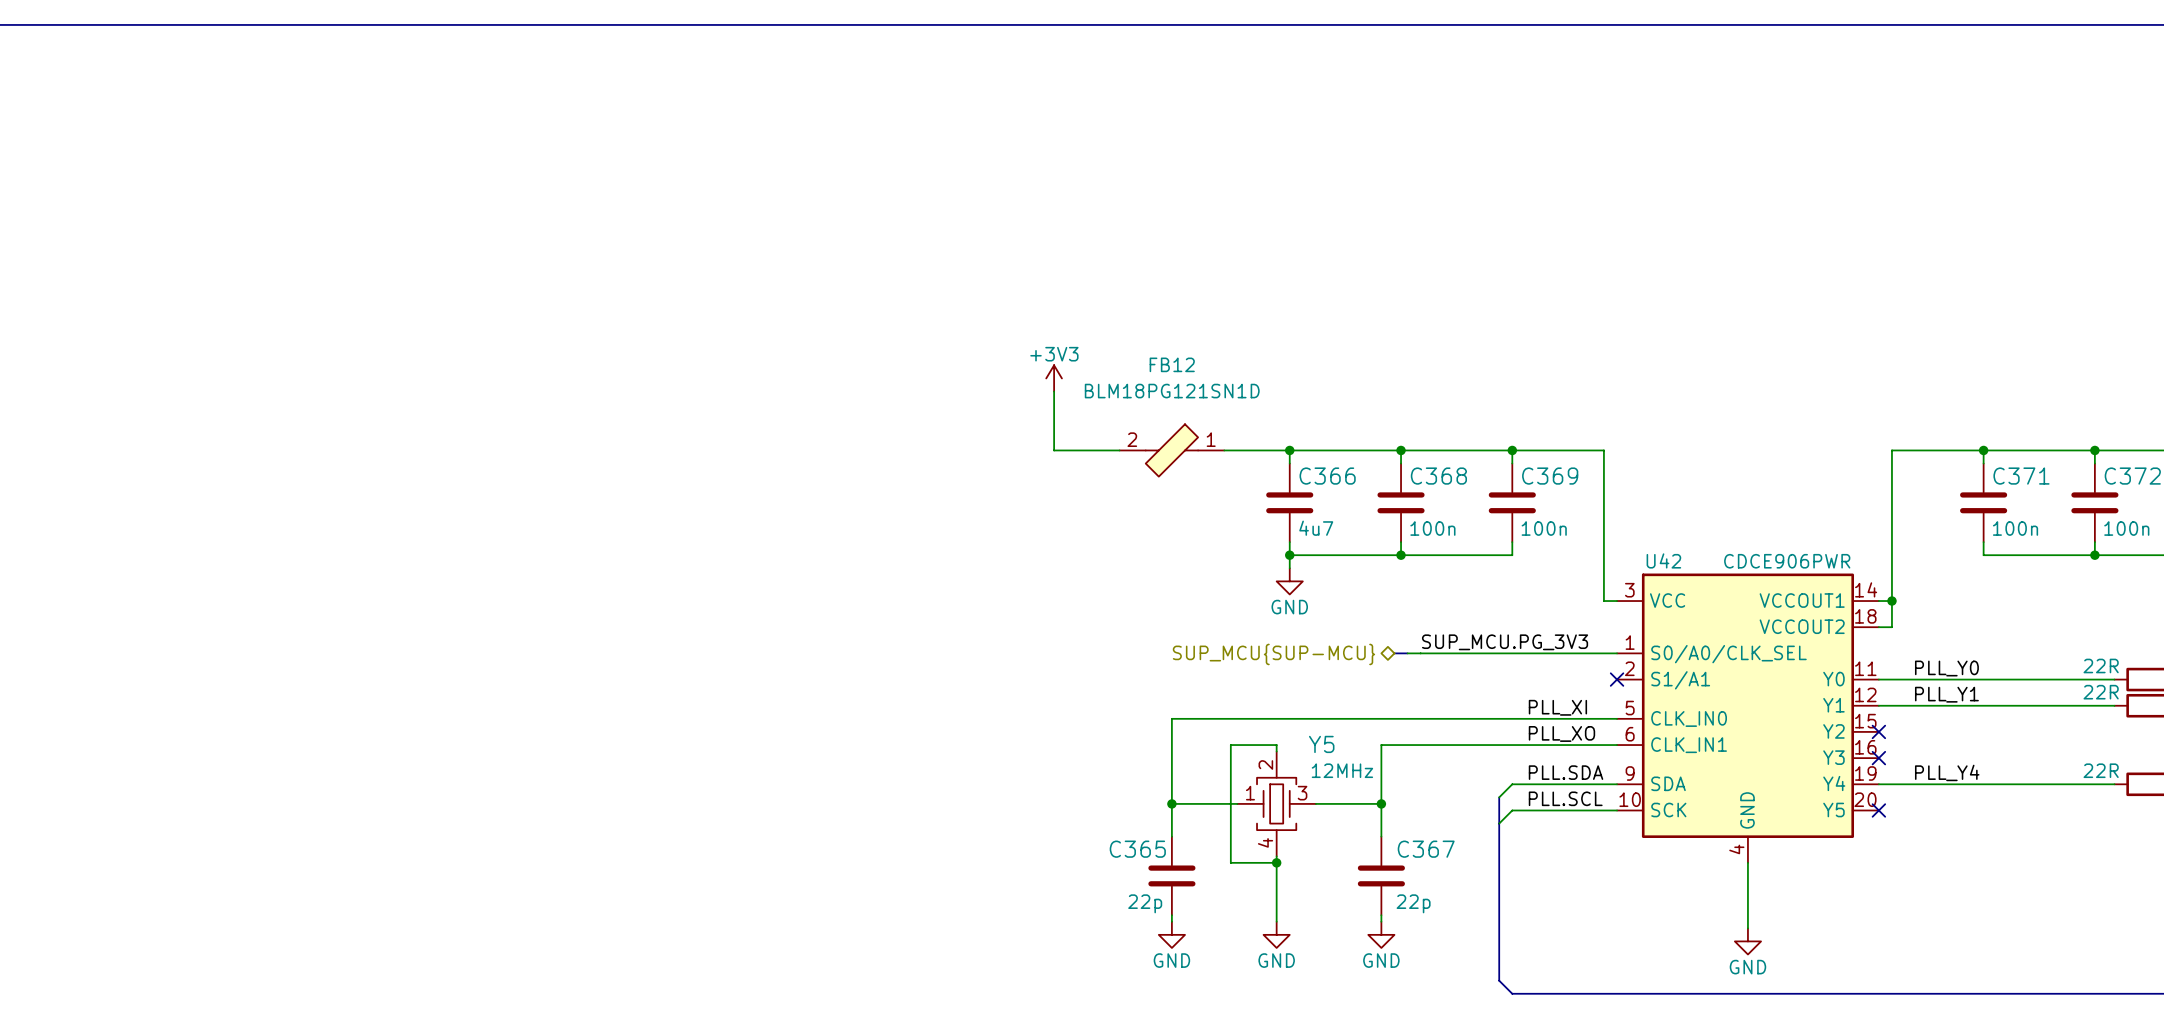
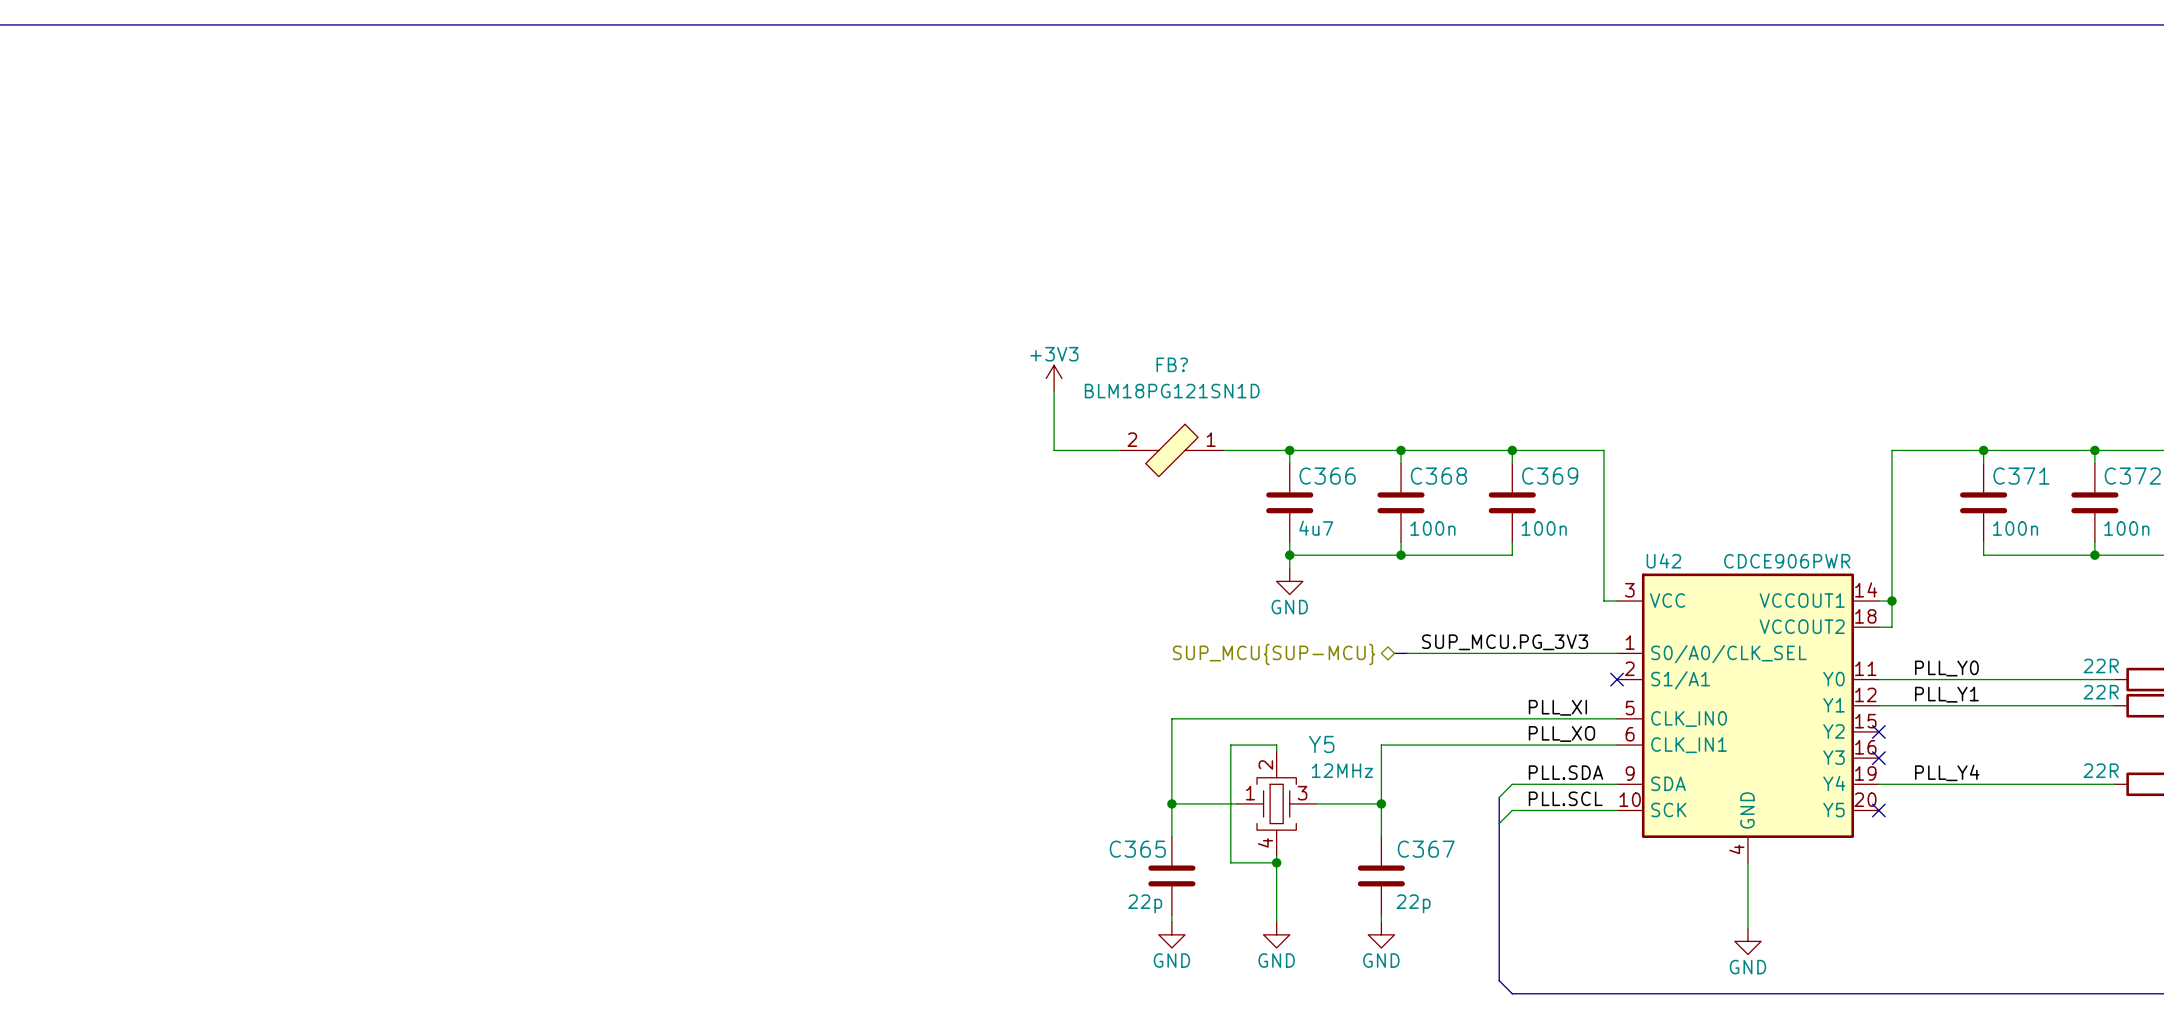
FB12 name: FB12 (1172, 364) -> FB? (1172, 364)

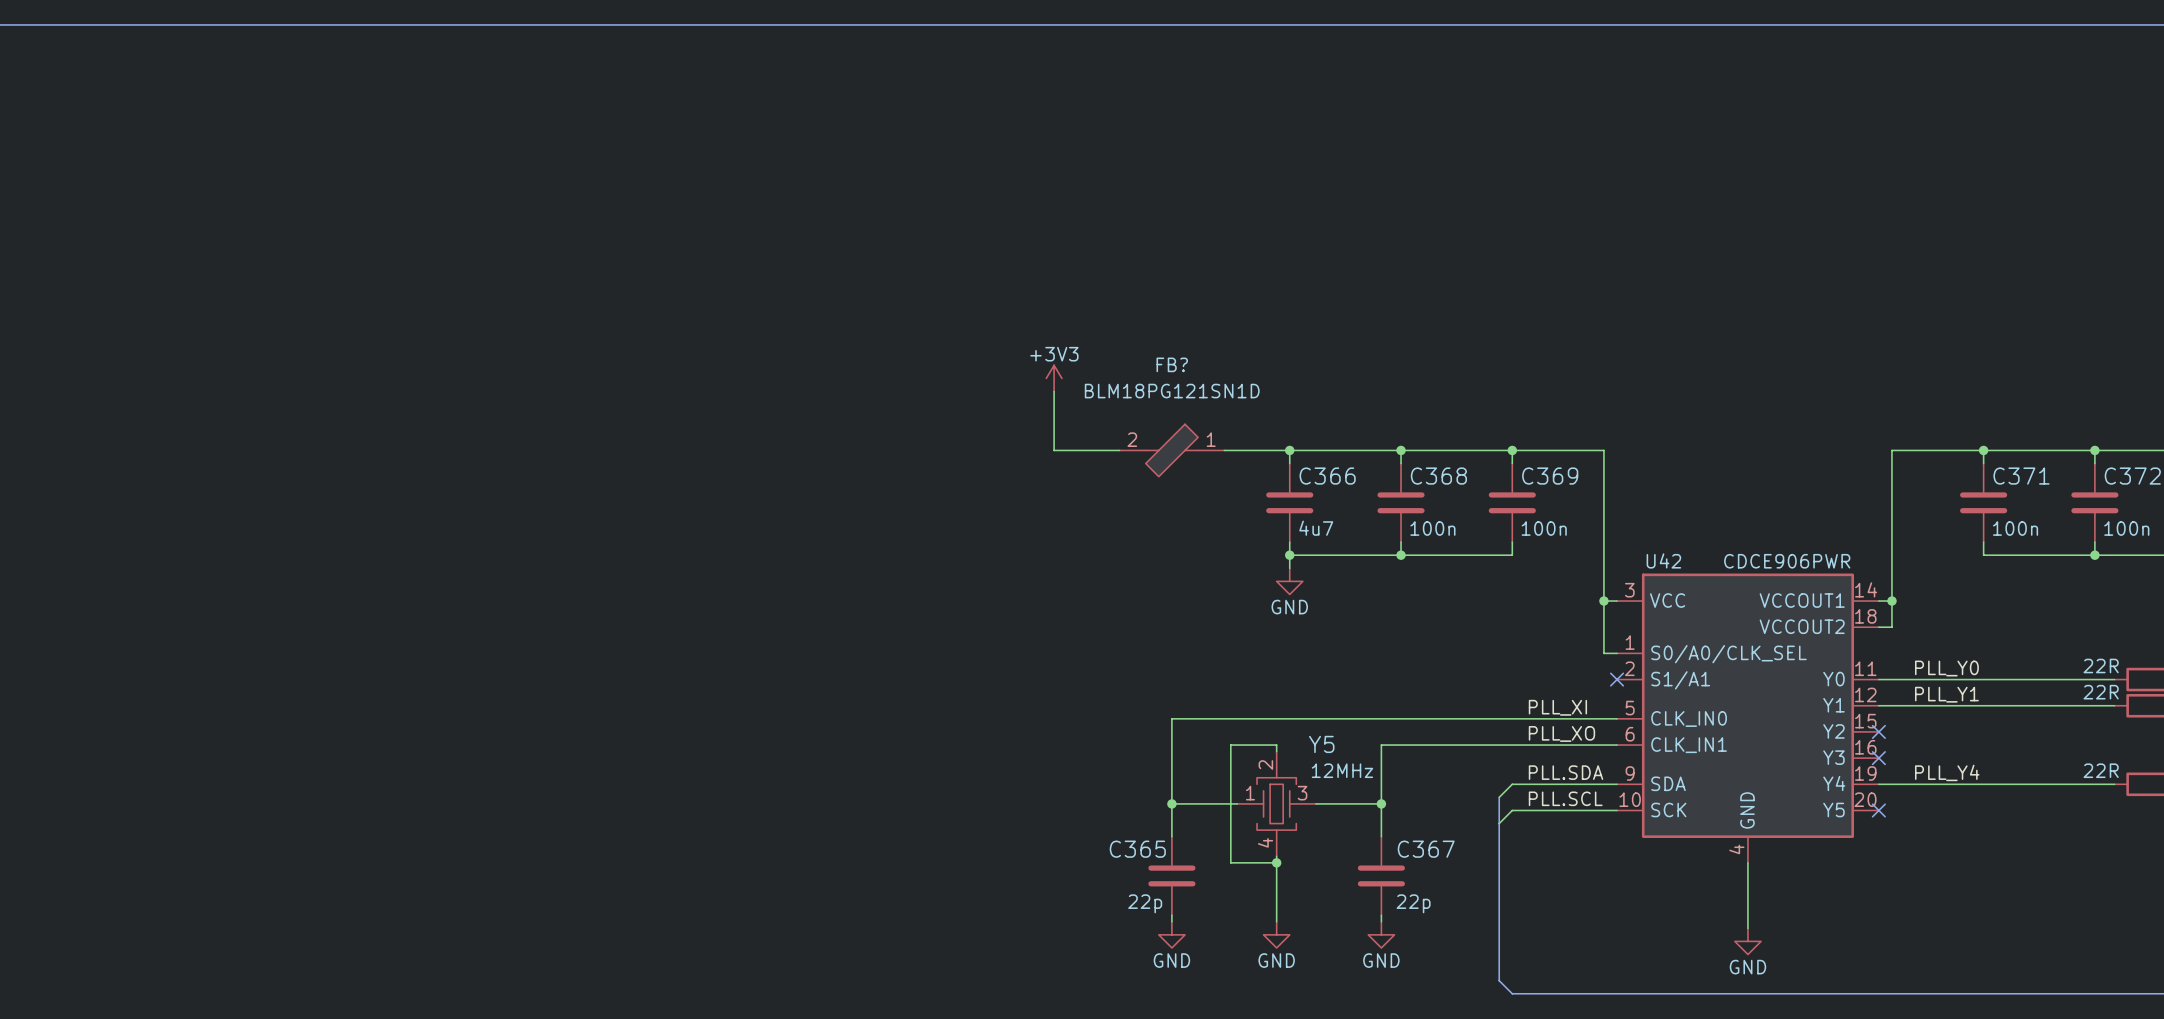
junction: none -> (1603, 601)
label: SUP_MCU.PG_3V3 (1505, 642) -> none
bus: (1394, 653) (1407, 653) -> none
wire: (1407, 653) (1603, 653) -> (1603, 601) (1603, 653)
hierarchical label: SUP_MCU{SUP-MCU} (1273, 654) -> none

